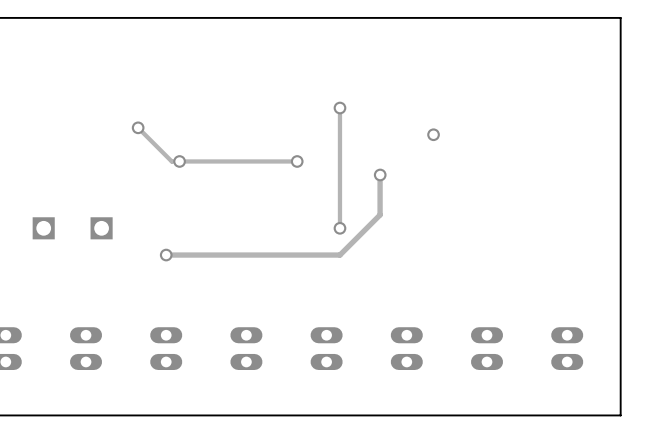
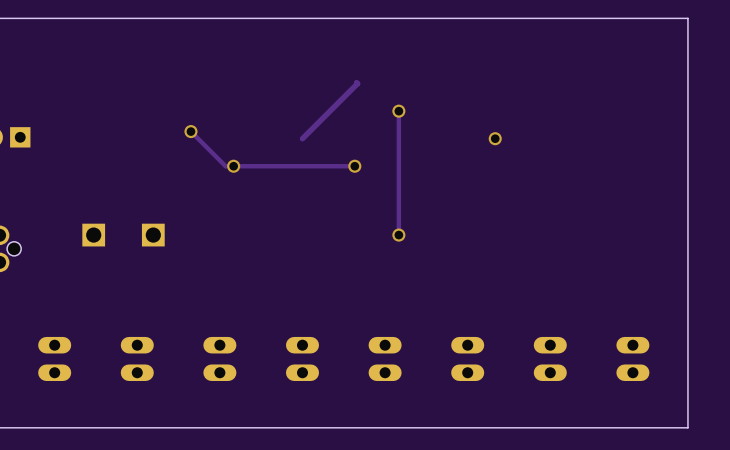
track: none -> (356, 82) (302, 138)
track: (380, 174) (380, 214) (339, 255) (166, 255) -> none
via: (380, 174) -> none
via: (166, 255) -> none

